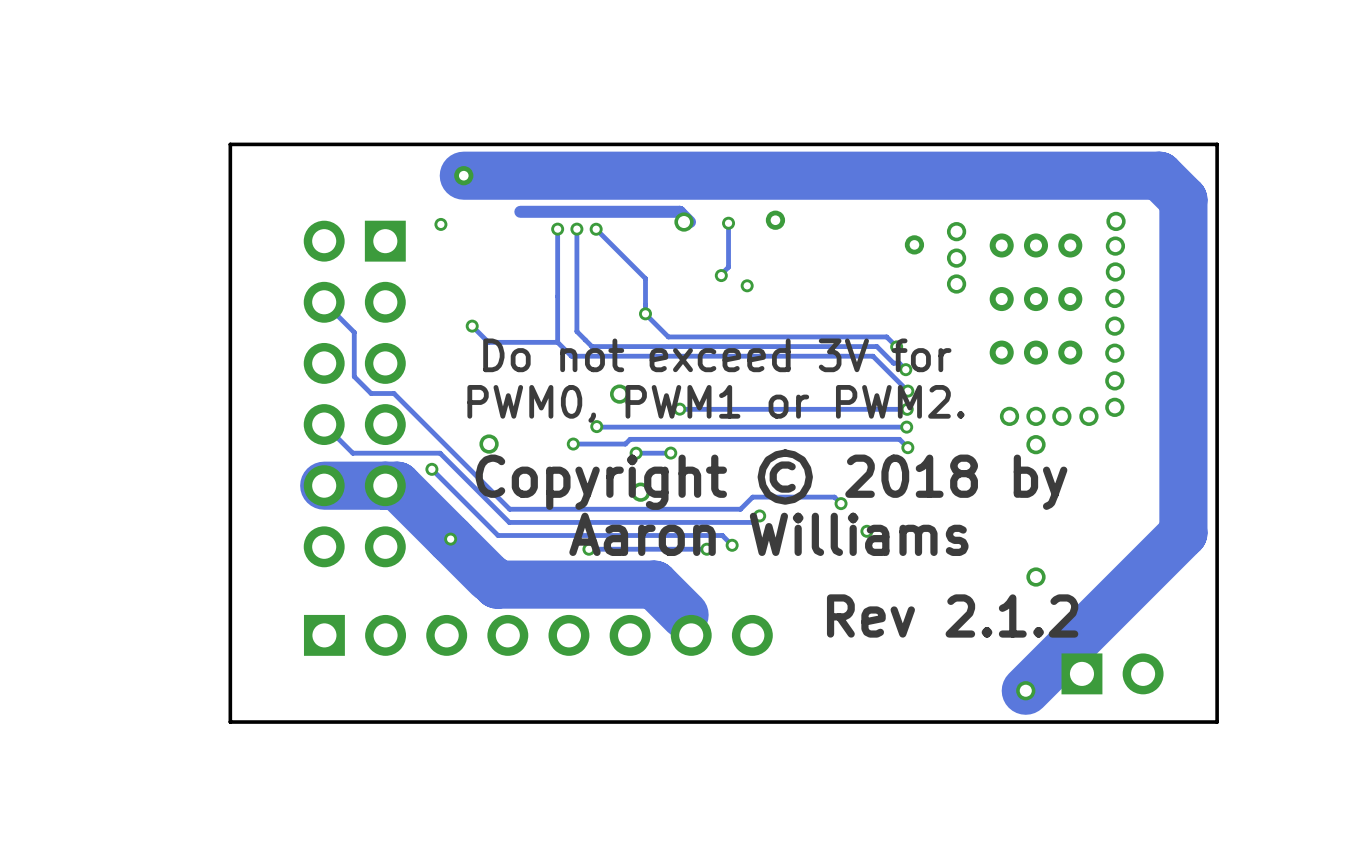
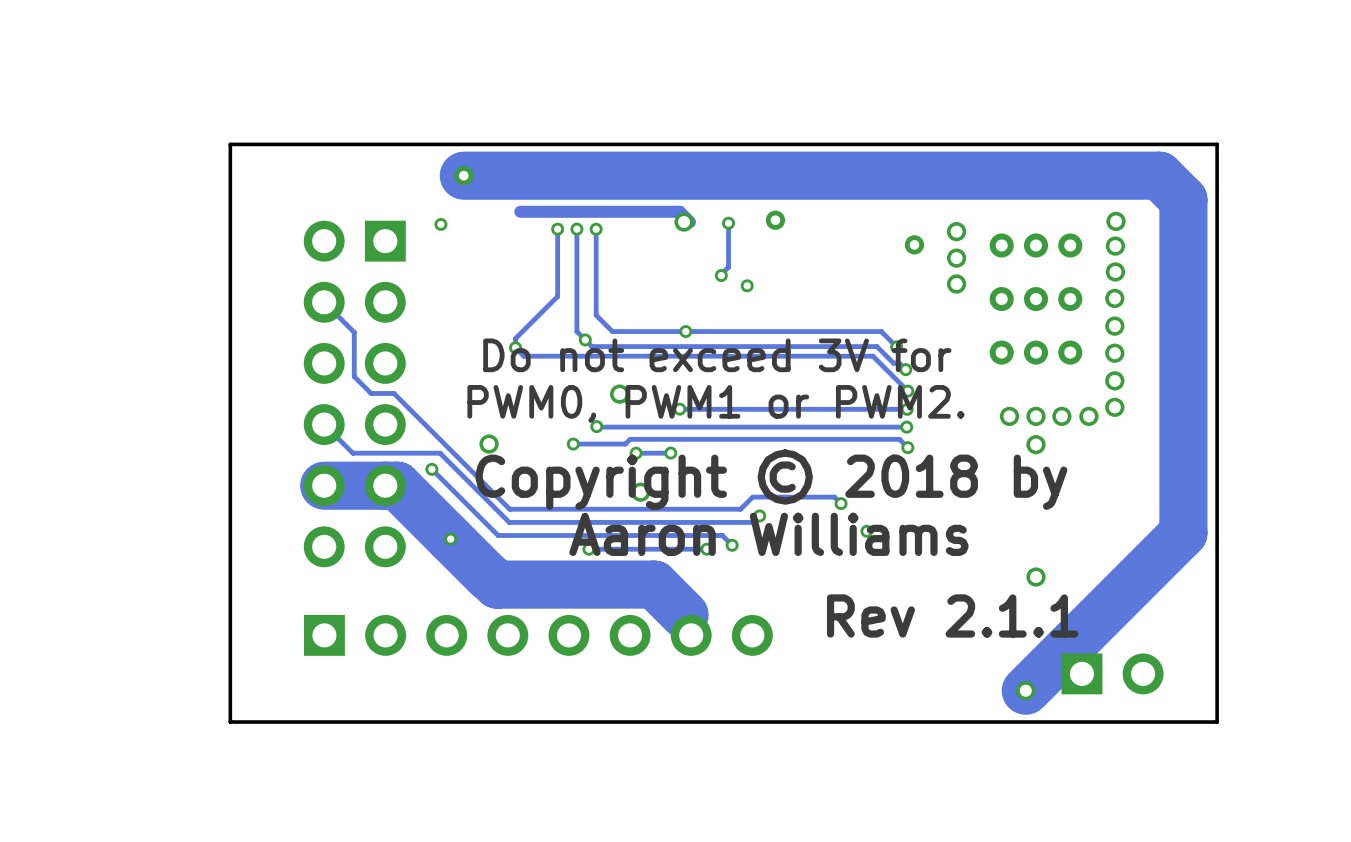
track: (596, 229) (645, 278) (645, 314) (668, 336) (886, 336) -> (596, 229) (596, 315) (612, 331) (881, 331) (886, 336)
track: (557, 296) (557, 342) -> (557, 296) (515, 338) (515, 347) (523, 356) (571, 356)
via: (645, 313) -> none
track: (472, 326) (488, 342) (557, 342) -> none
via position: (472, 326) -> (515, 347)
via: none -> (685, 331)
via: none -> (585, 339)
track: (557, 342) (571, 356) -> none
text: Rev 2.1.2 (952, 615) -> Rev 2.1.1 (952, 615)

